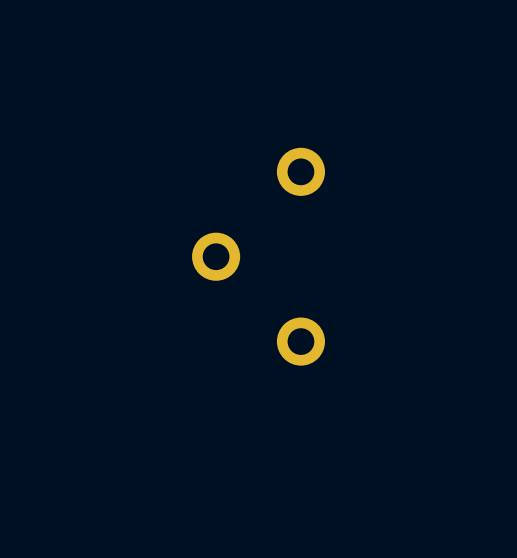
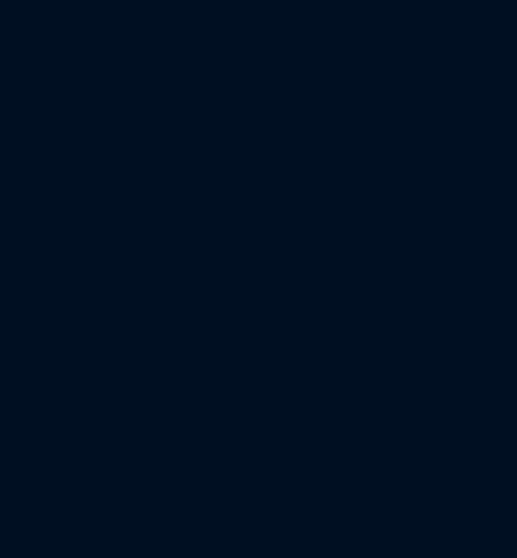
part: (258, 256) -> none

